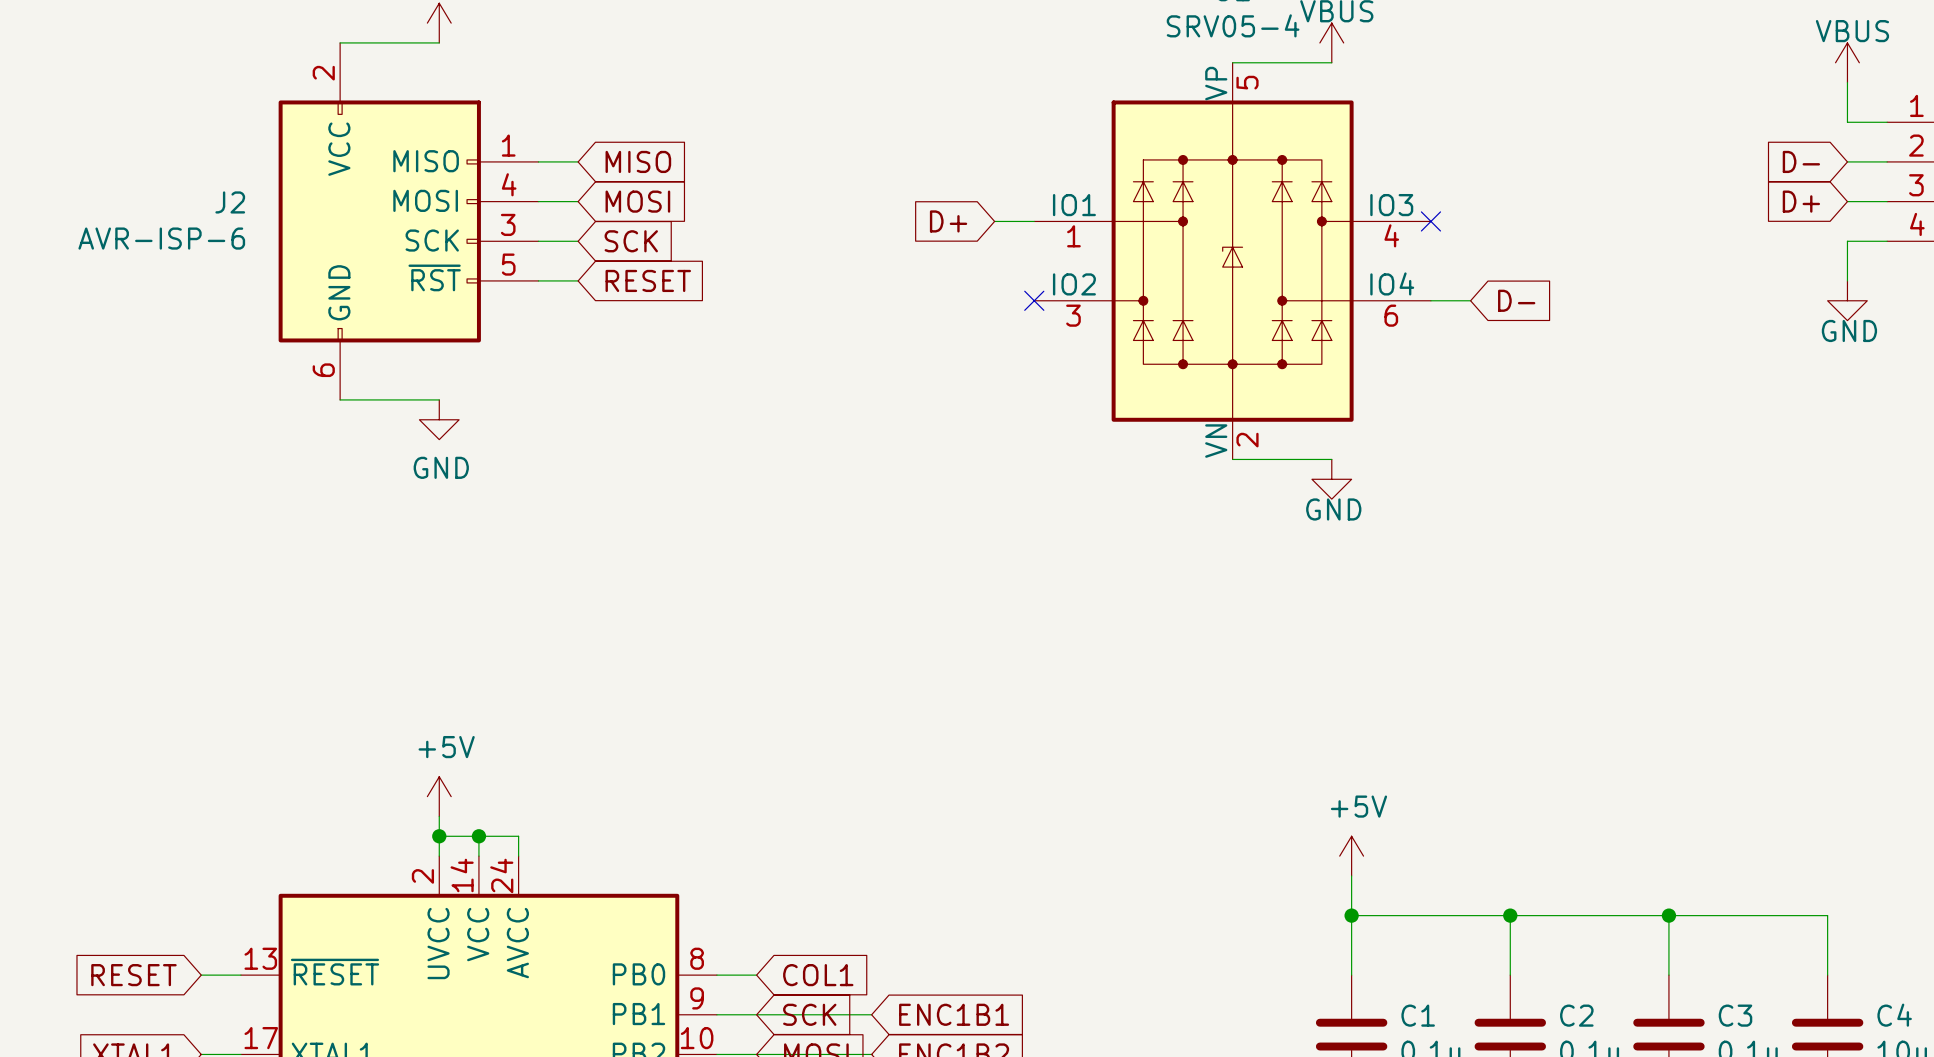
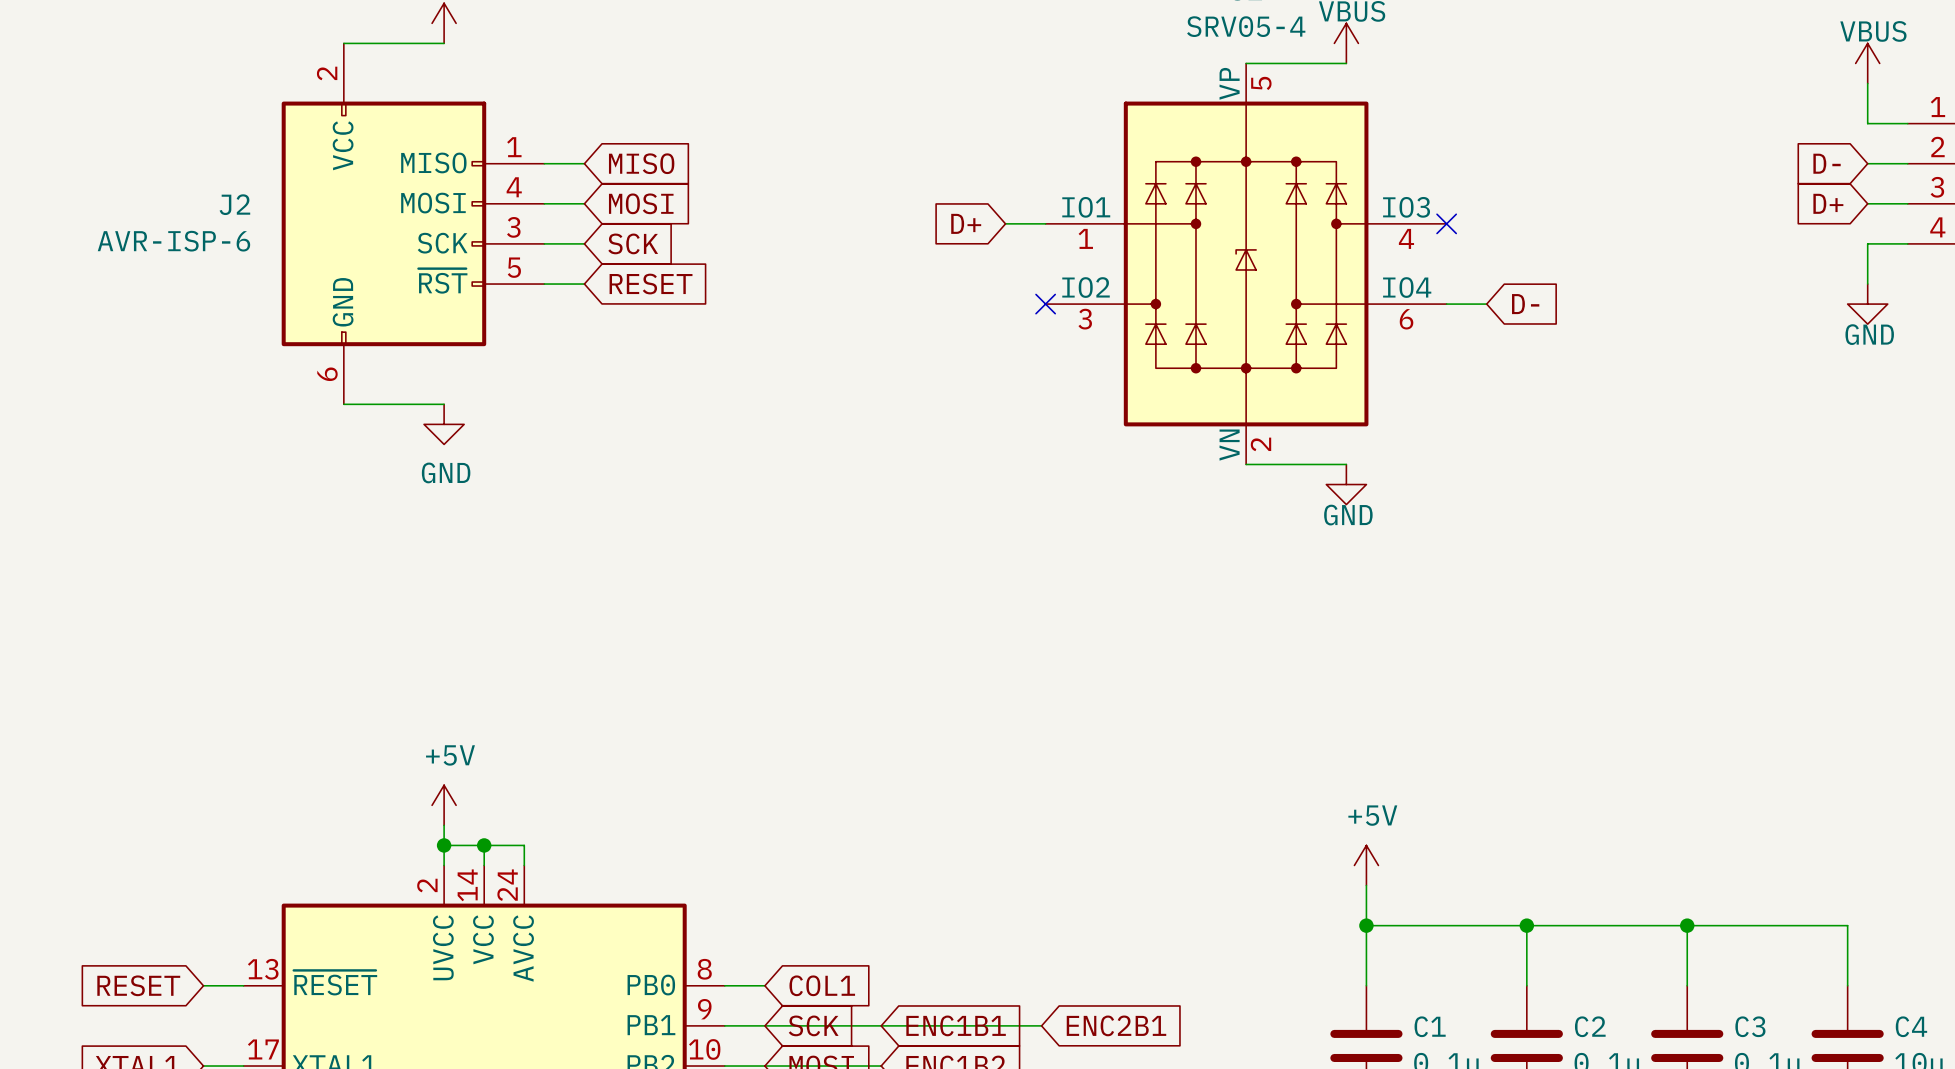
wire: none -> (881, 1025) (1041, 1025)
global label: none -> ENC2B1 (1116, 1025)

